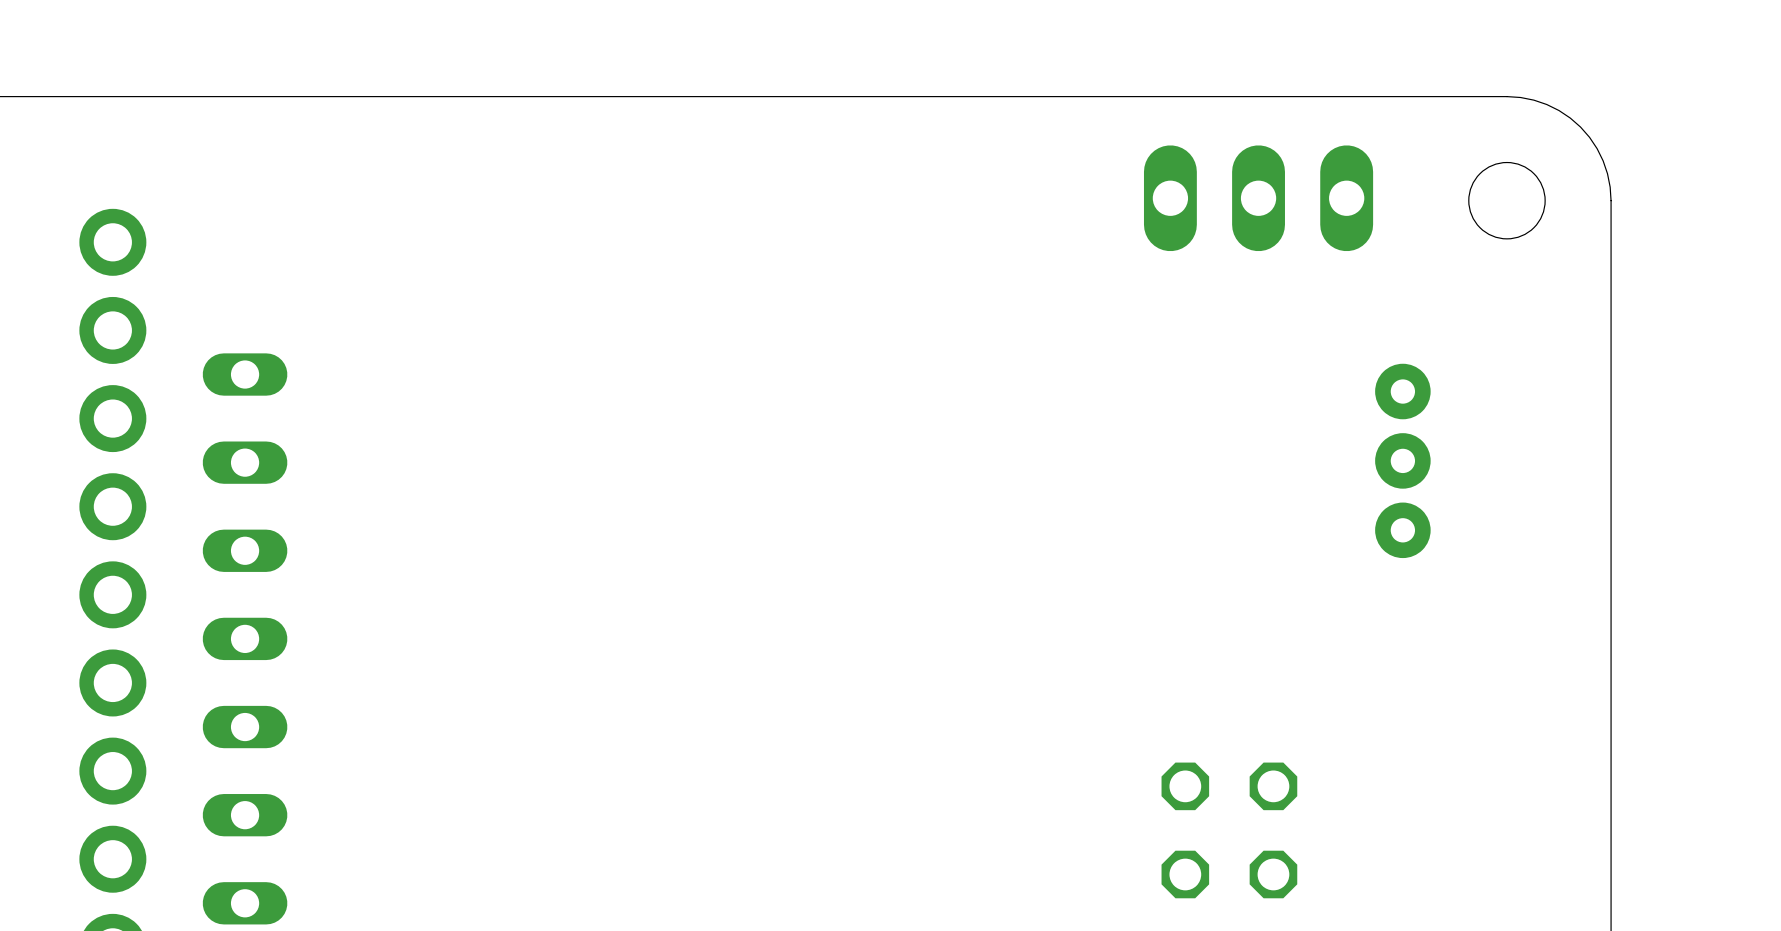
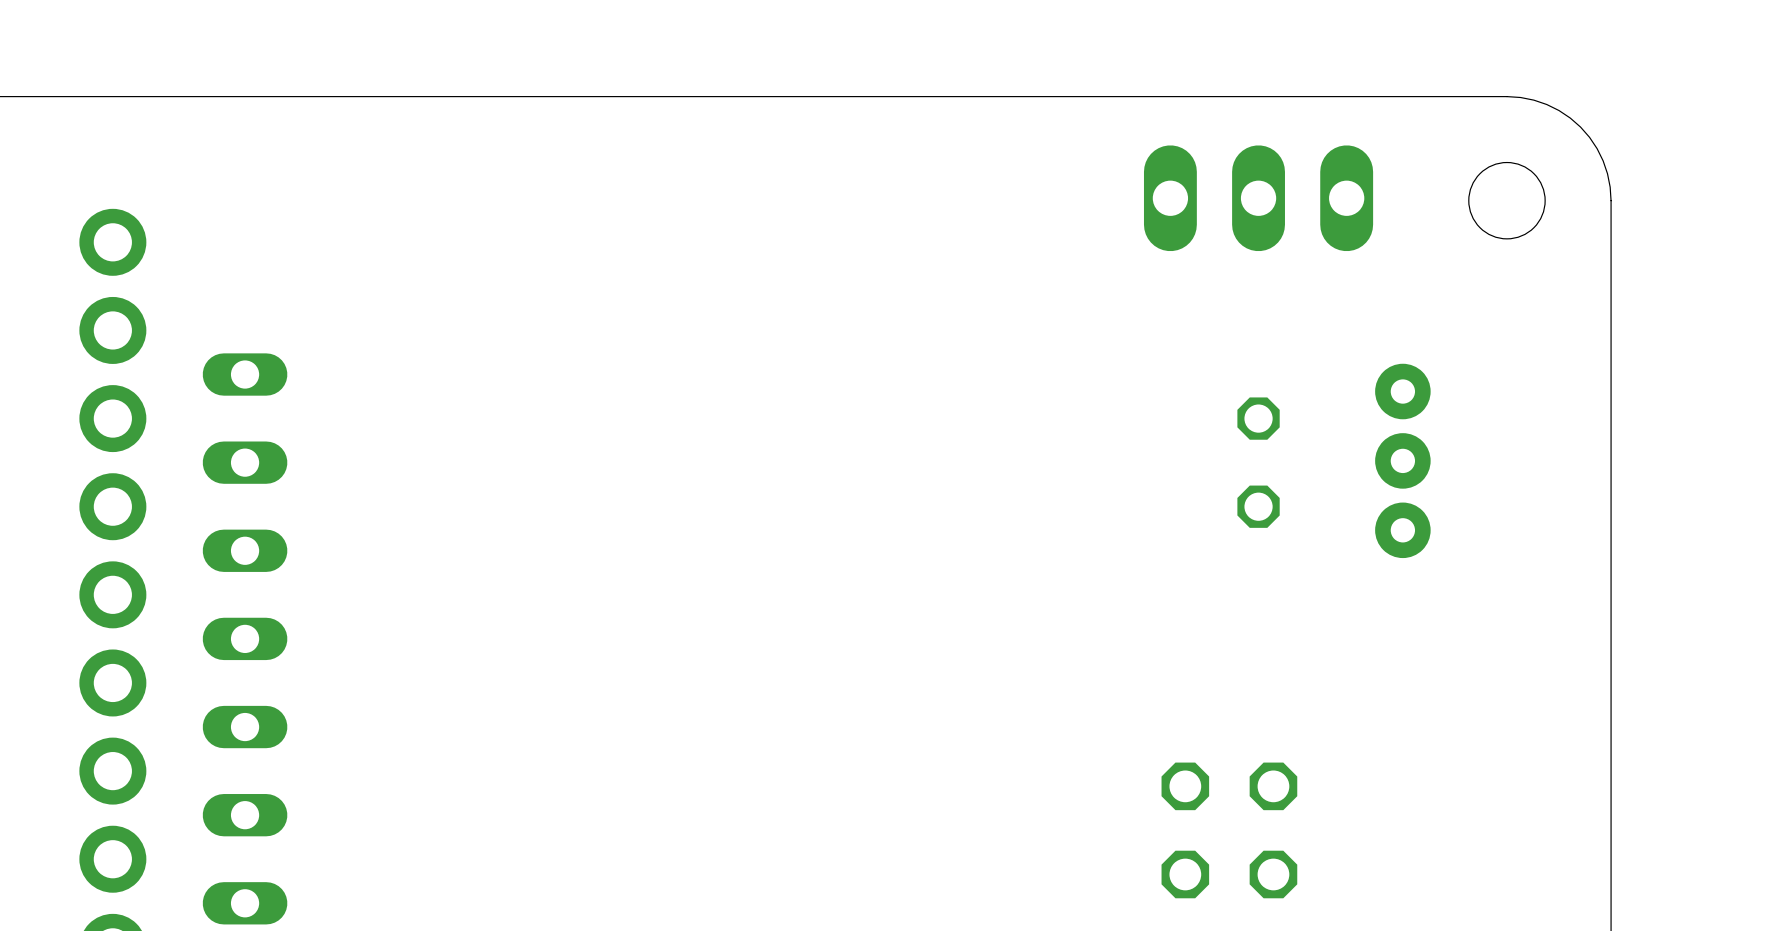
part: none -> (1258, 462)

